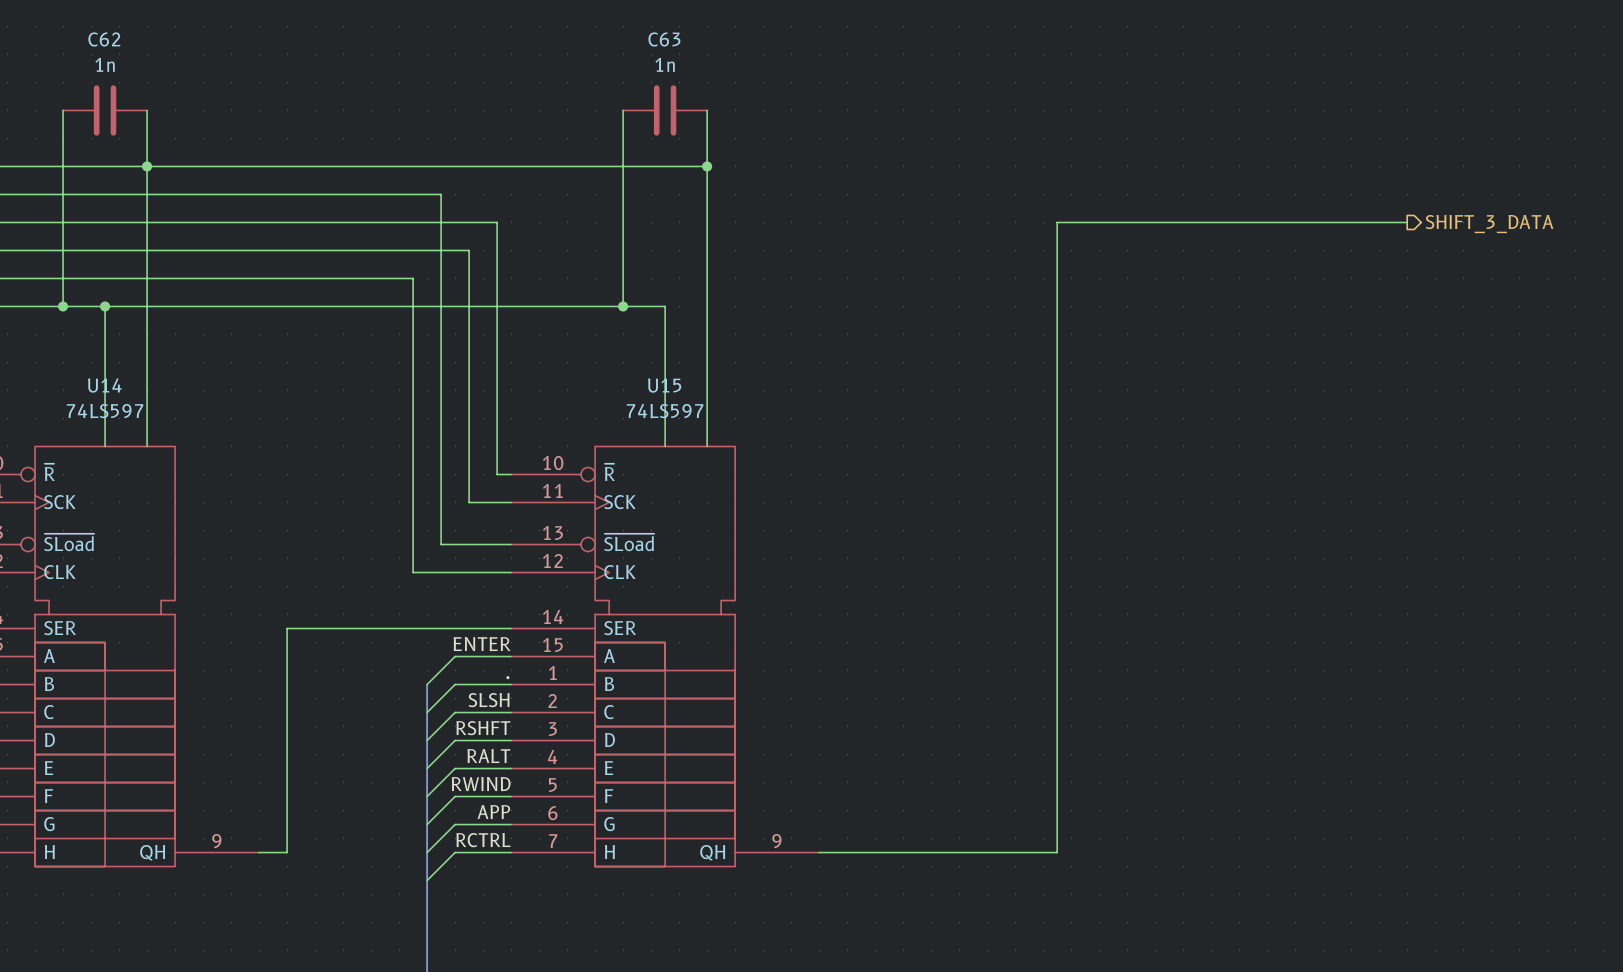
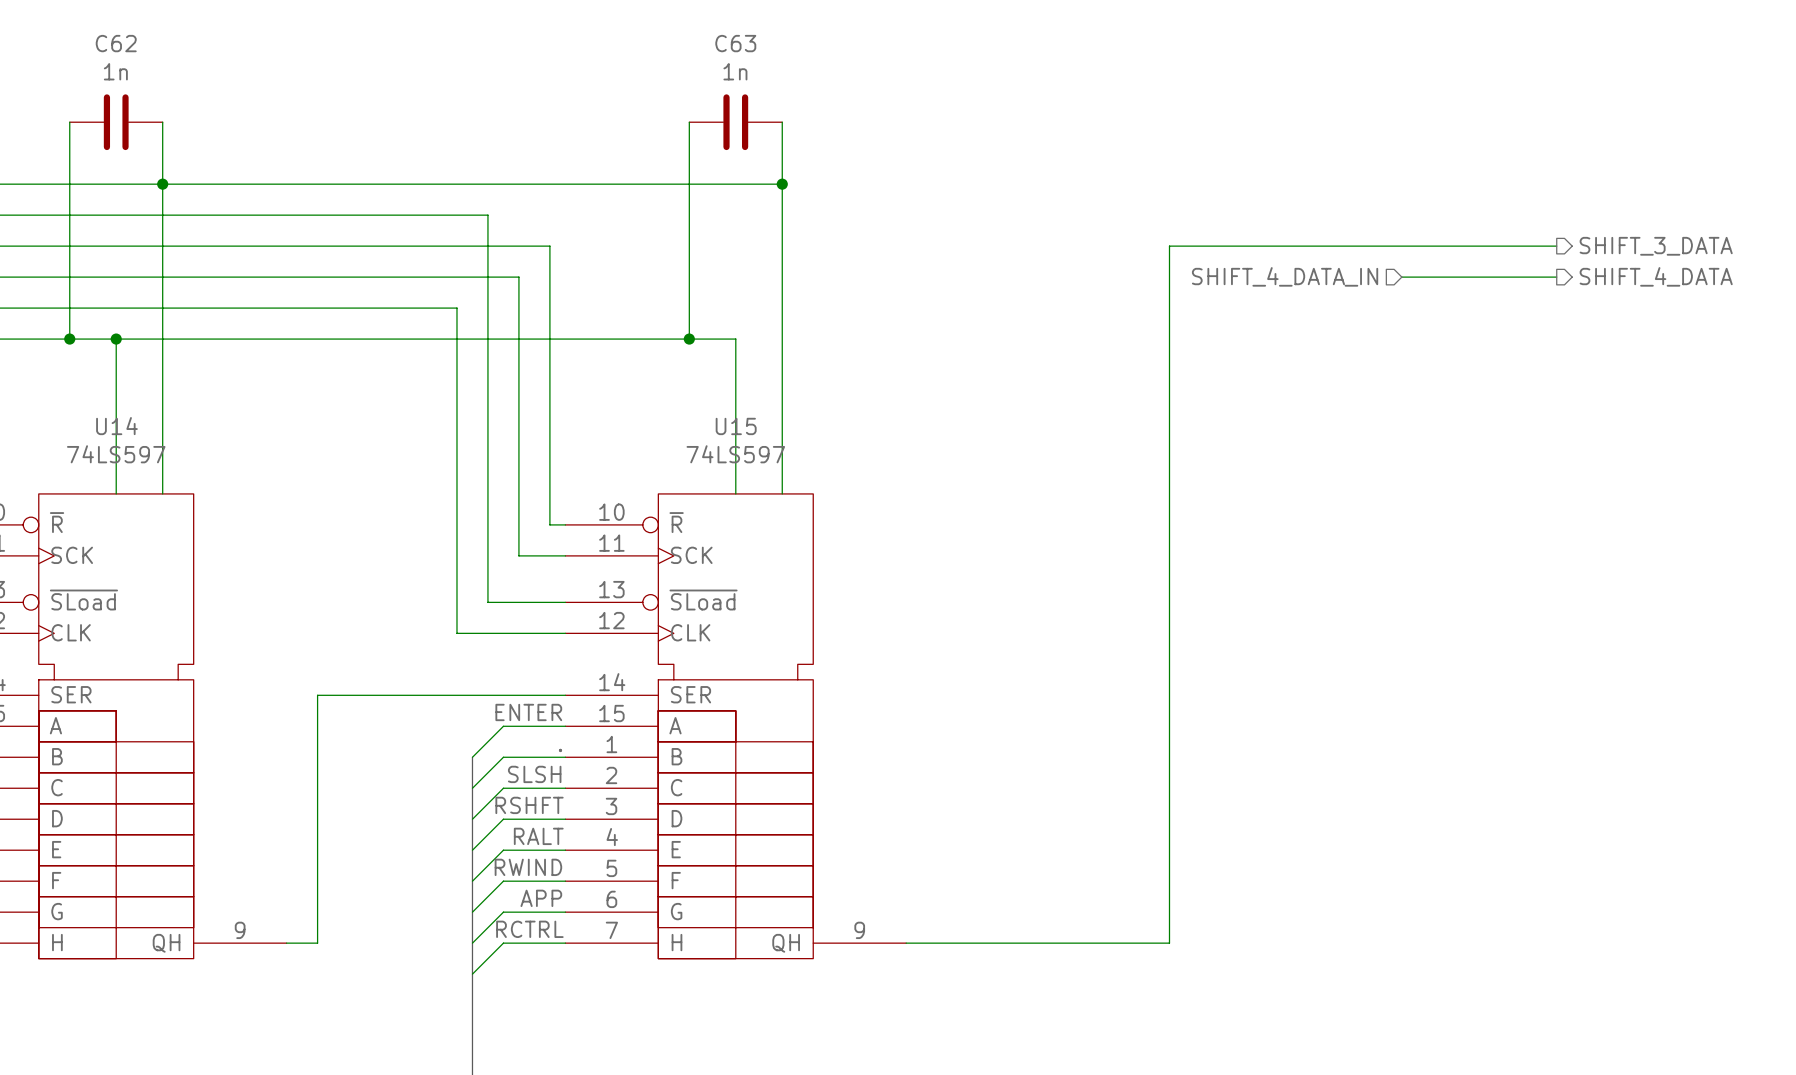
wire: none -> (1401, 277) (1556, 277)
hierarchical label: none -> SHIFT_4_DATA_IN (1285, 276)
hierarchical label: none -> SHIFT_4_DATA (1656, 276)

